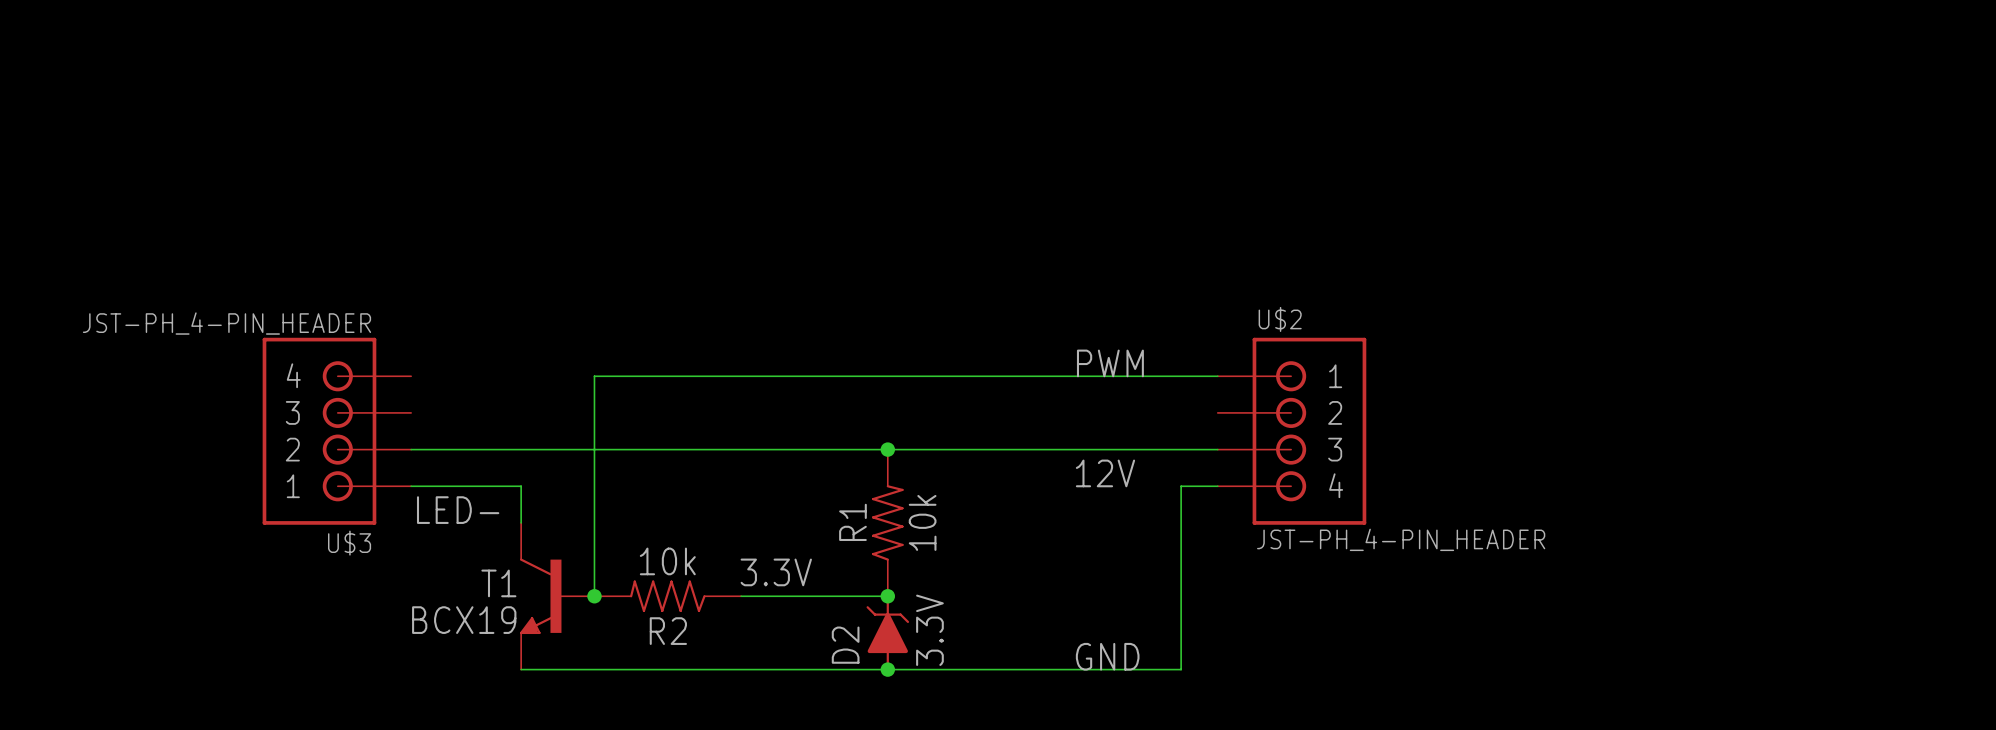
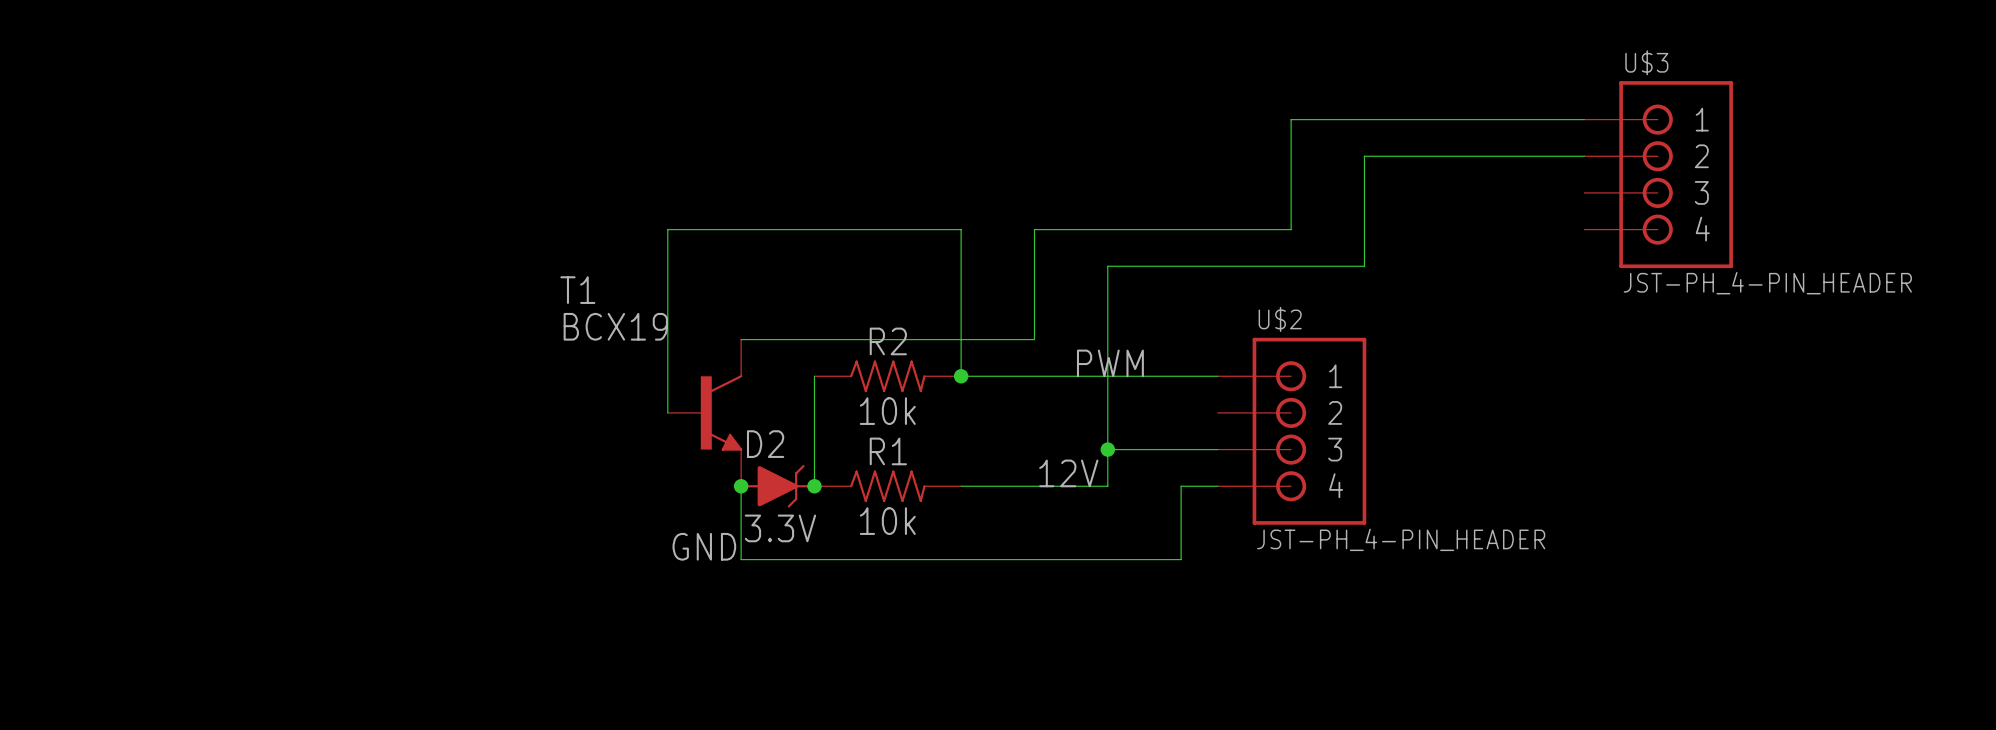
wire: none -> (1584, 119) (1291, 119) (1291, 229) (1034, 229) (1034, 339) (741, 339)
wire: none -> (1584, 156) (1364, 156) (1364, 266) (1107, 266) (1107, 486) (961, 486)
wire: none -> (814, 376) (814, 486)
wire: (961, 376) (594, 376) (594, 596) -> (961, 376) (961, 229) (667, 229) (667, 412)
junction: none -> (961, 376)
U$3 rotation: 0° (319, 431) -> 180° (1676, 174)
U$3 position: (336, 431) -> (1658, 174)
wire: (411, 449) (1107, 449) -> none
junction: (887, 449) -> none
junction: none -> (1107, 449)
label position: 12V (1105, 473) -> 12V (1068, 473)
wire: (411, 486) (521, 486) (521, 522) -> none
junction: none -> (741, 486)
junction: none -> (814, 486)
label: LED- (458, 510) -> none
R1 rotation: 0° (887, 522) -> 90° clockwise (887, 486)
label: none -> GND (704, 546)
wire: (1181, 559) (1181, 669) (521, 669) -> (1181, 559) (741, 559) (741, 486)
label: 3.3V (776, 572) -> none
T1 name position: T1 (498, 583) -> T1 (577, 290)
T1 flip: as is (540, 596) -> left-right (721, 412)
T1 position: (557, 596) -> (705, 412)
junction: (594, 596) -> none
R2 rotation: 0° (667, 596) -> 180° (887, 376)
R2 position: (667, 596) -> (887, 376)
wire: (741, 596) (887, 596) -> none
junction: (887, 596) -> none
T1 value position: BCX19 (464, 620) -> BCX19 (615, 326)
D2 rotation: 0° (887, 632) -> 90° clockwise (777, 486)
D2 position: (887, 632) -> (777, 486)
label: GND (1107, 656) -> none
junction: (887, 669) -> none

